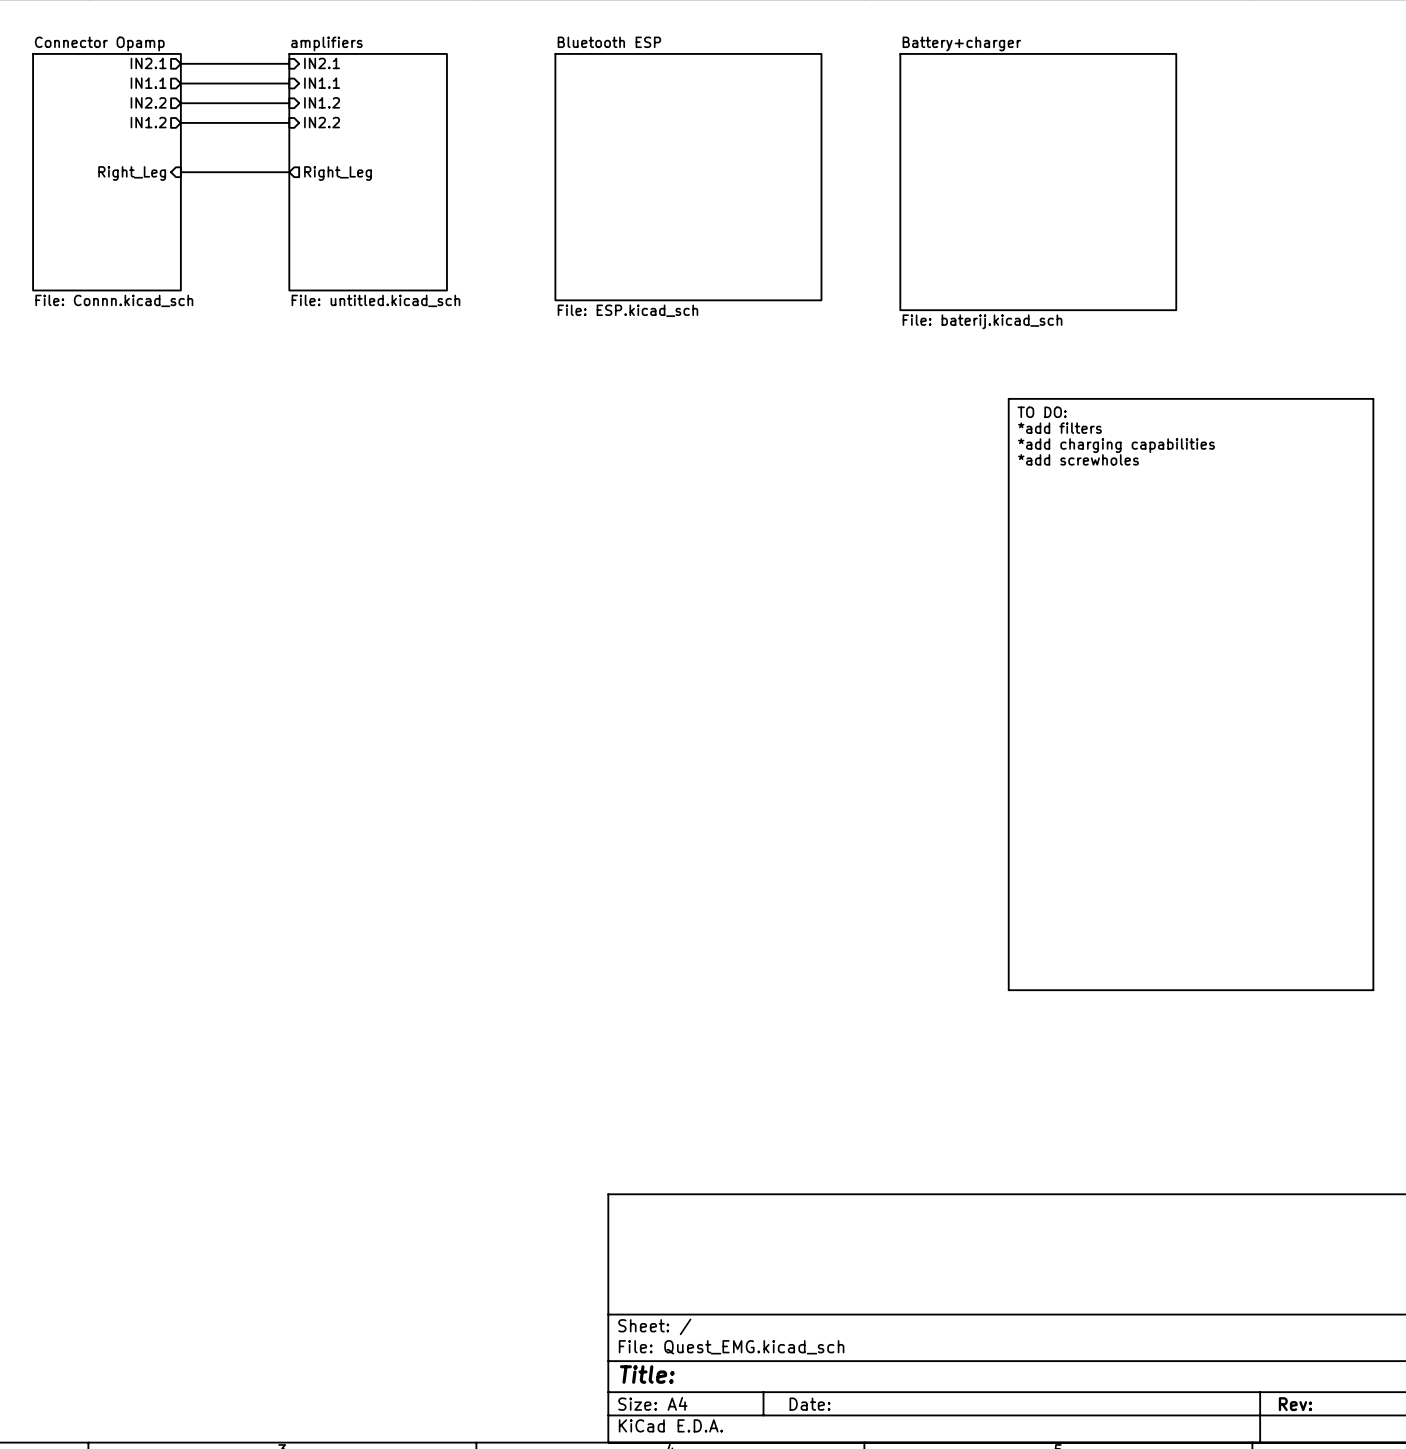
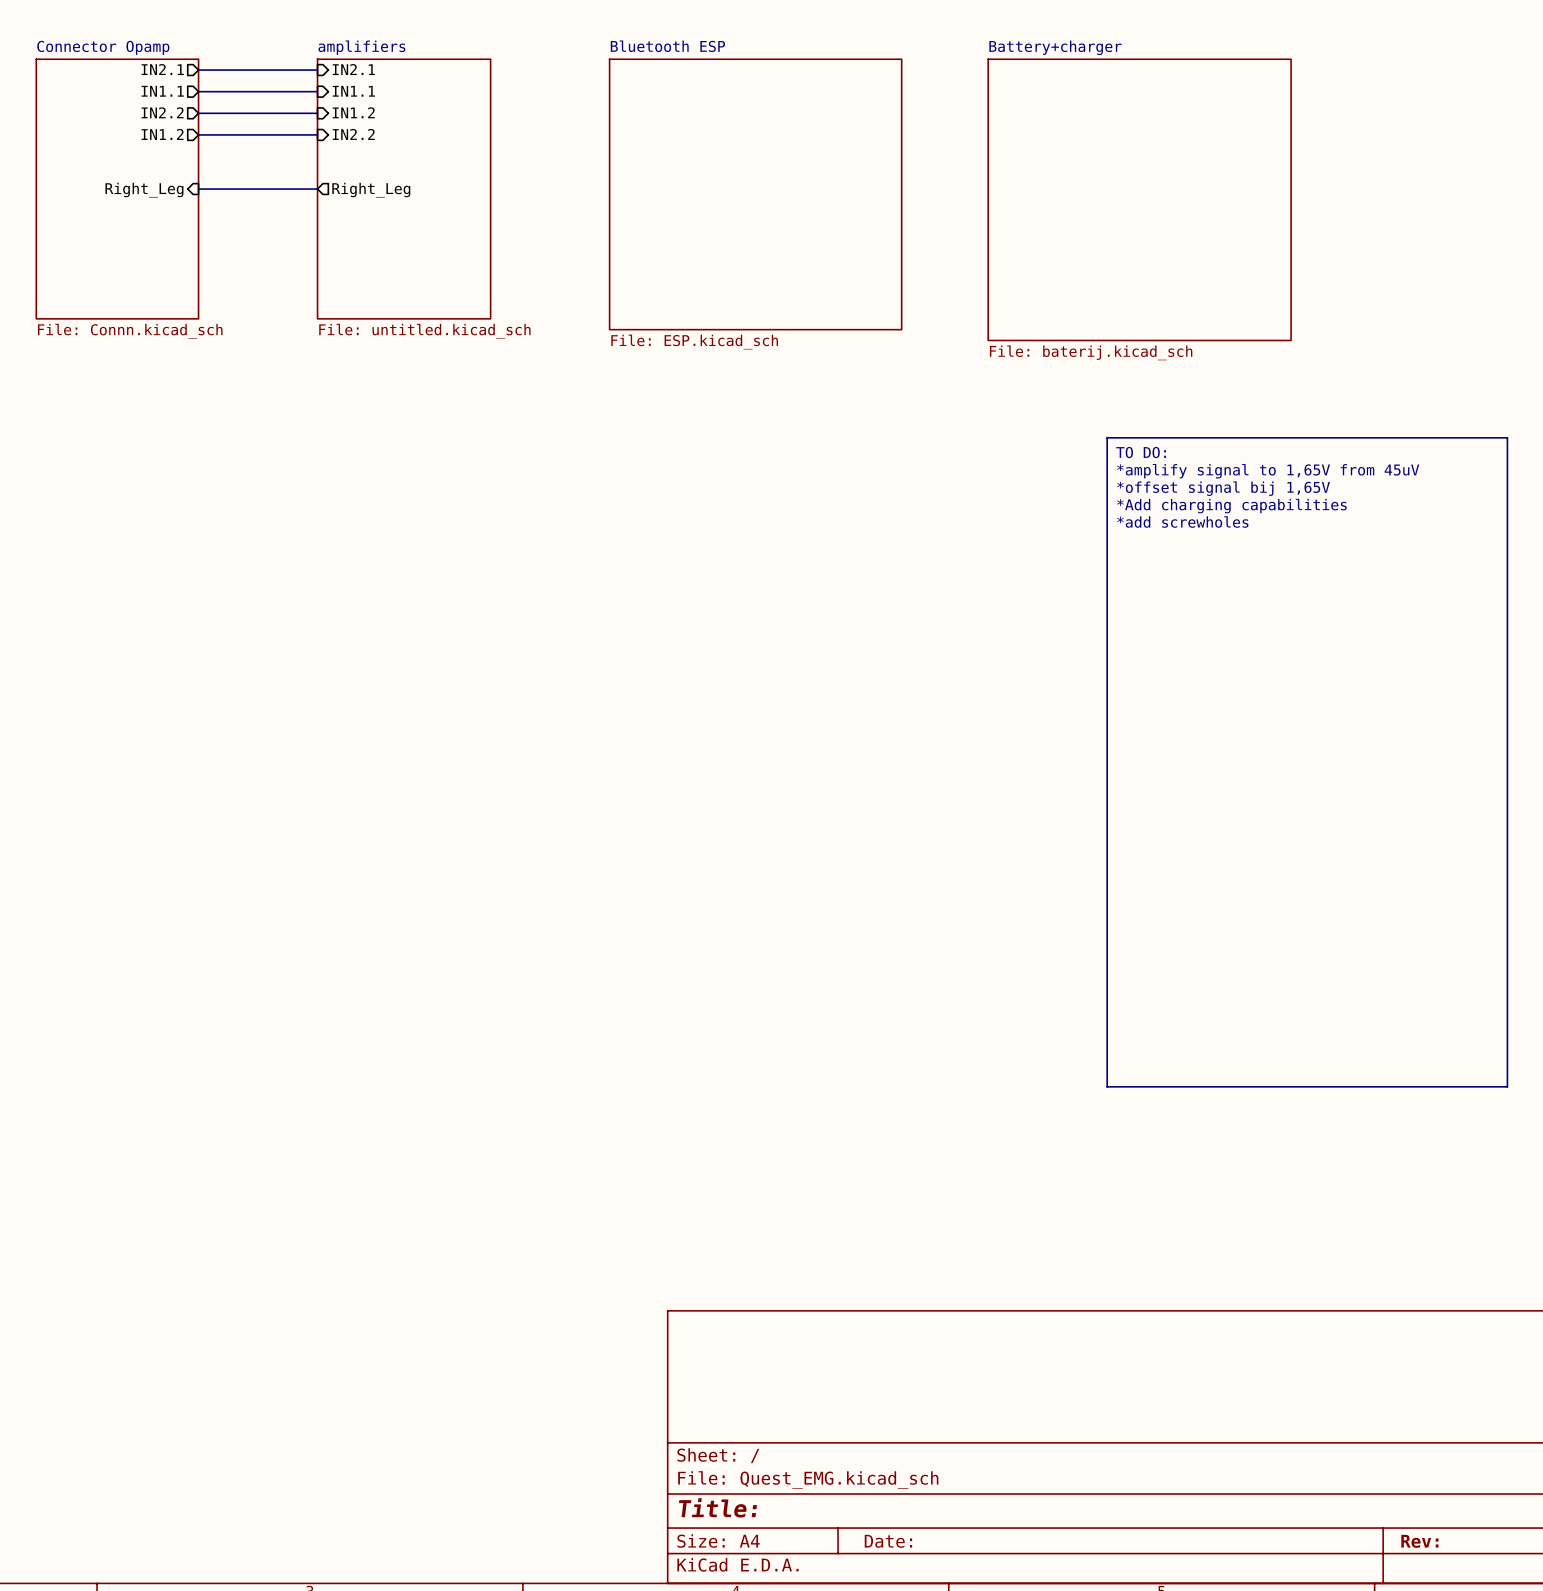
text: *add filters (1059, 428) -> *amplify signal to 1,65V from 45uV (1268, 471)
text: *add charging capabilities (1116, 445) -> *offset signal bij 1,65V (1223, 488)
text: *add screwholes (1078, 459) -> *Add charging capabilities (1231, 506)
text: none -> *add screwholes (1182, 522)

